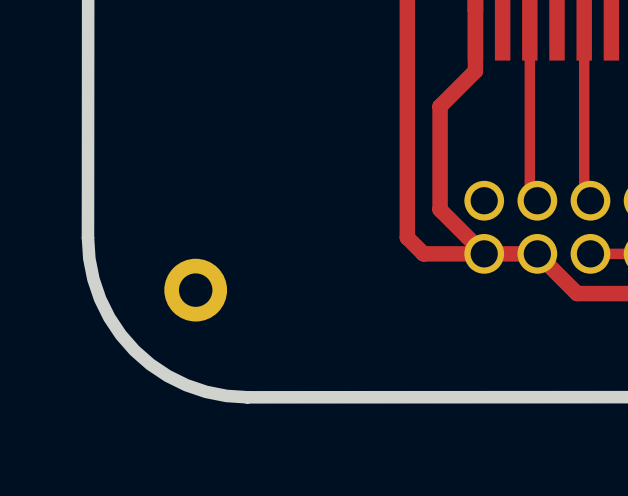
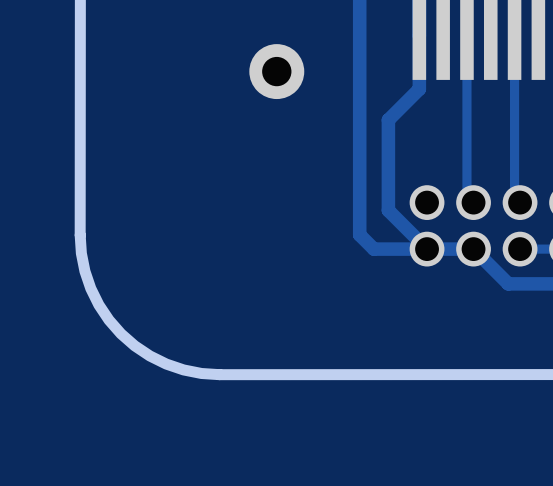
part position: (195, 290) -> (276, 71)

